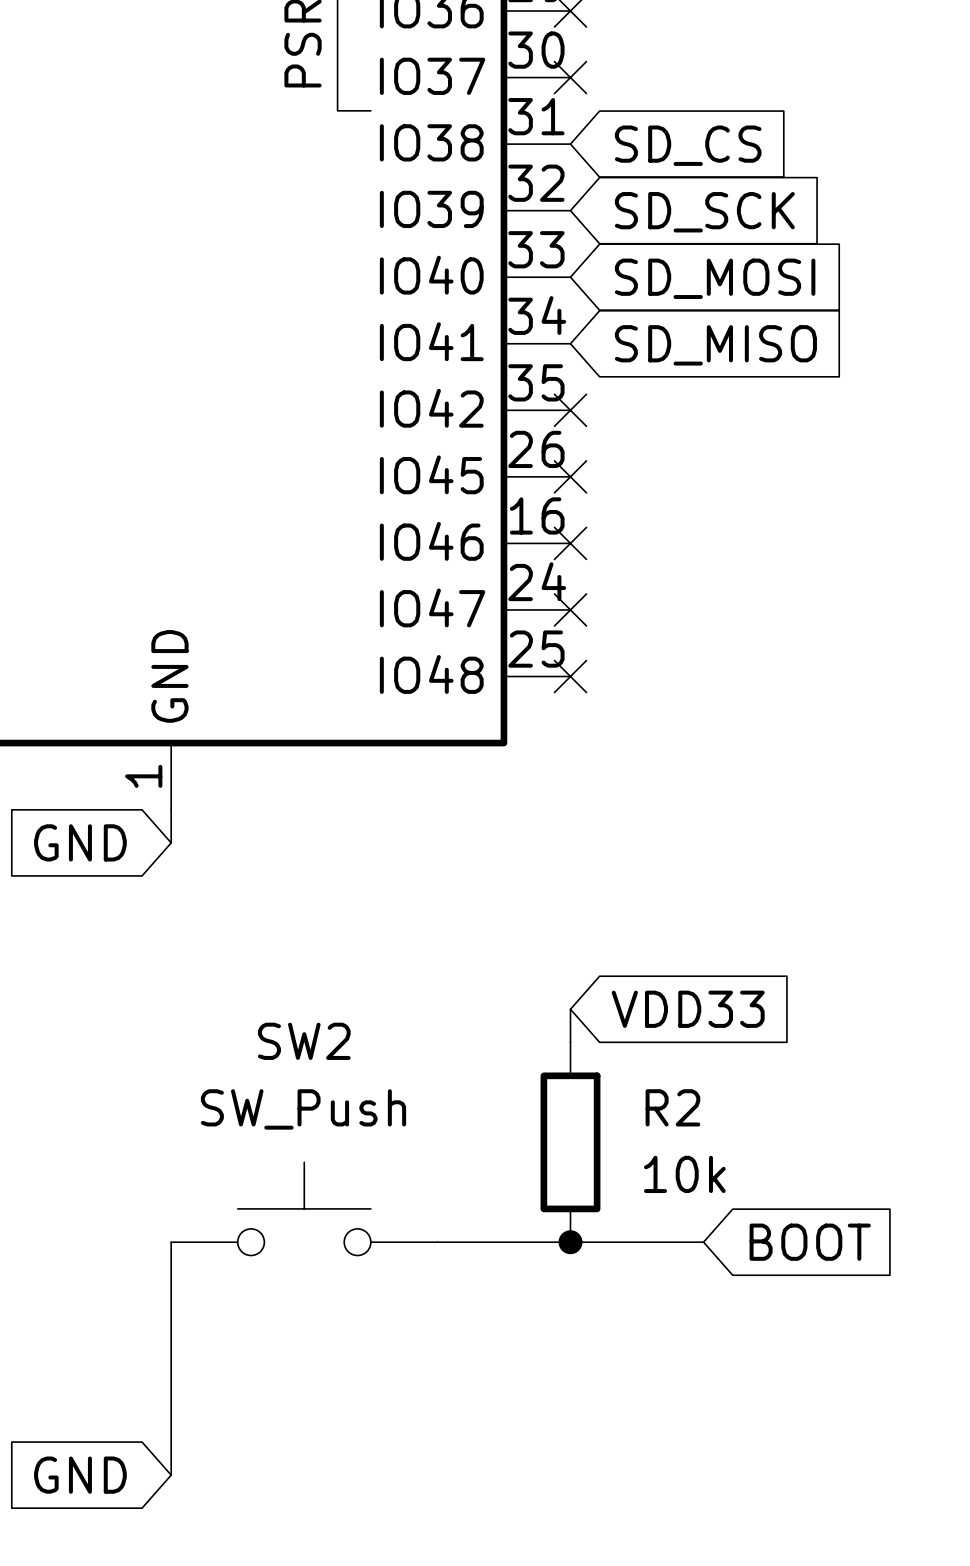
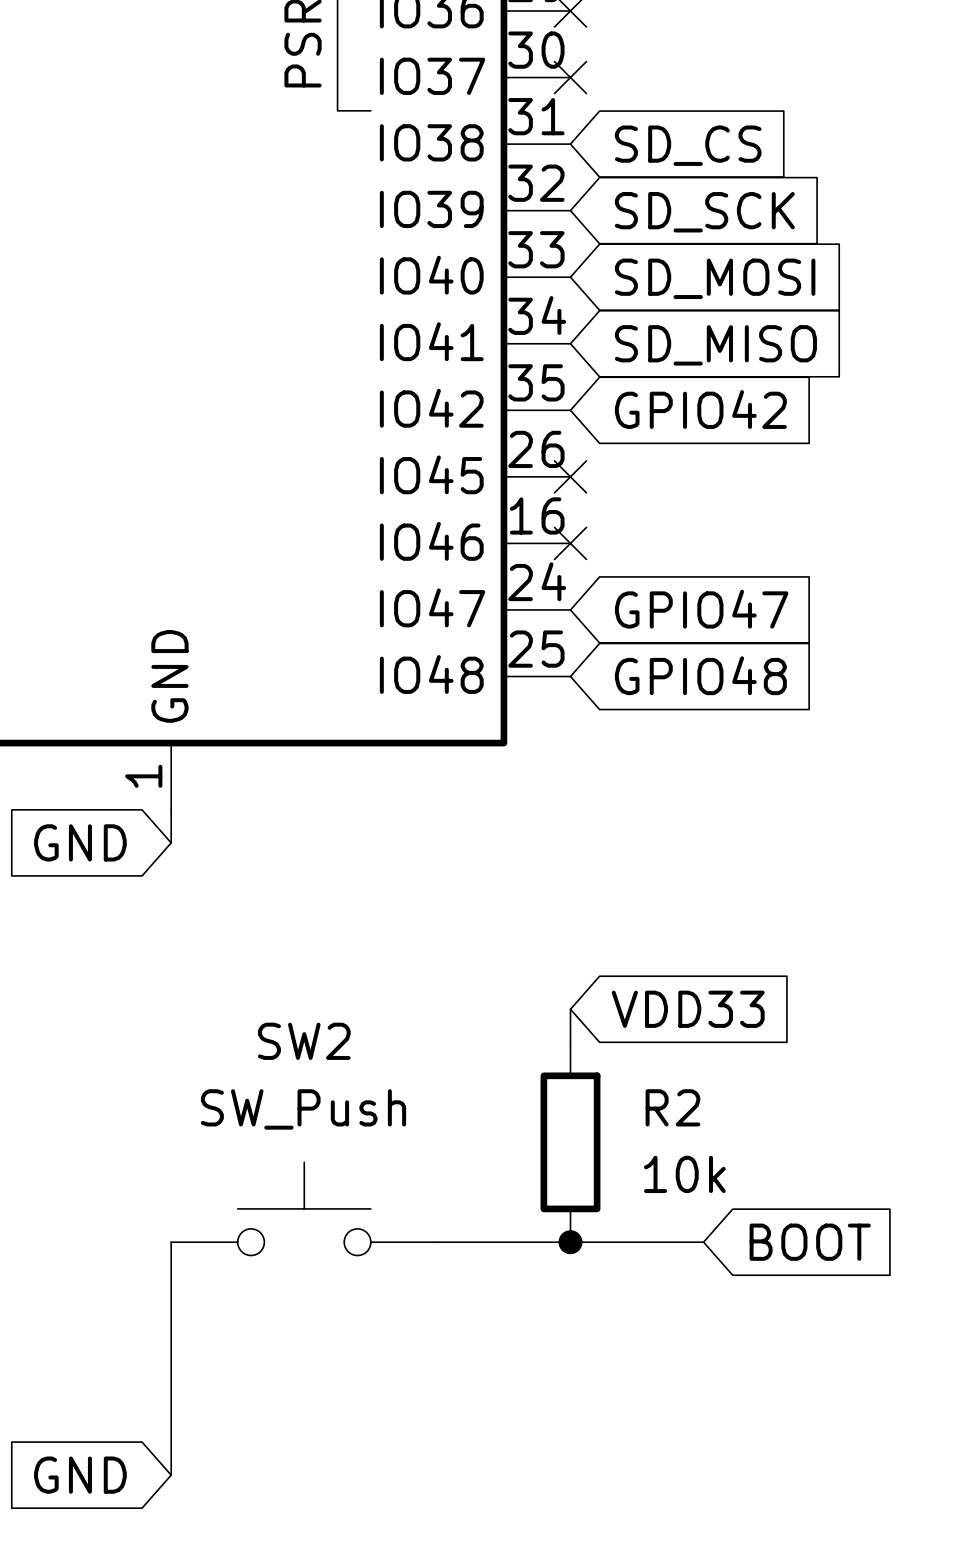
global label: none -> GPIO42 (700, 409)
no-connect mark: (570, 410) -> none
no-connect mark: (570, 609) -> none
global label: none -> GPIO47 (701, 609)
global label: none -> GPIO48 (700, 675)
no-connect mark: (570, 676) -> none

